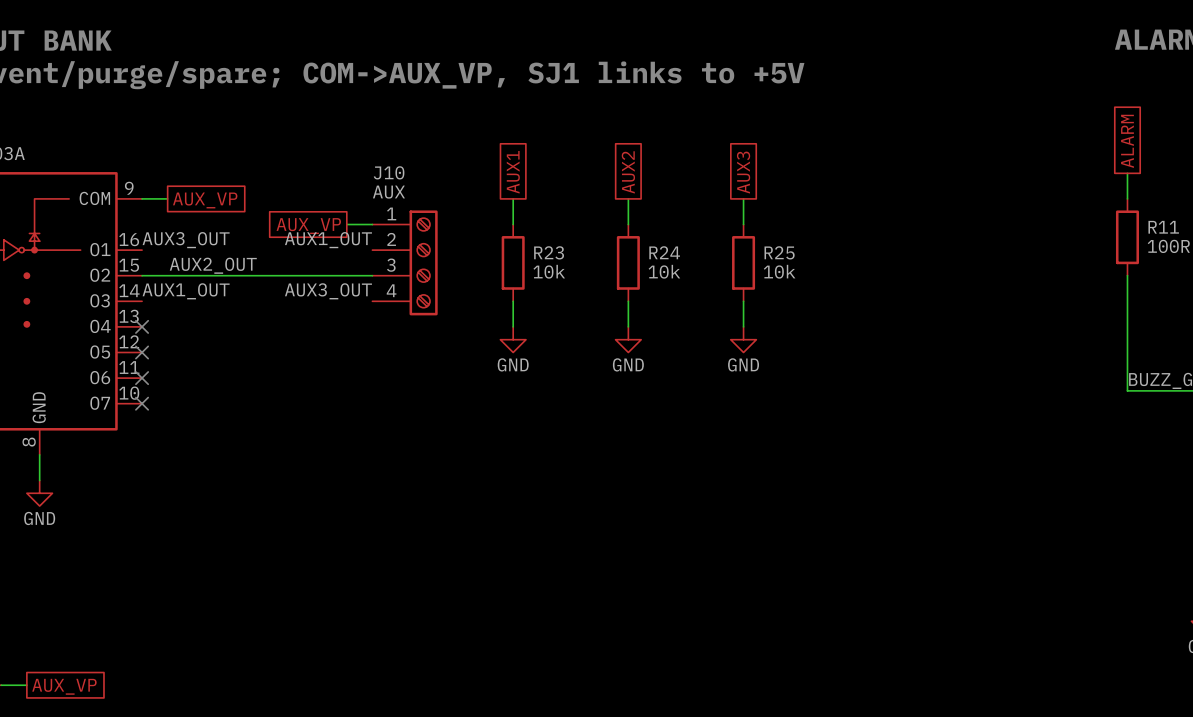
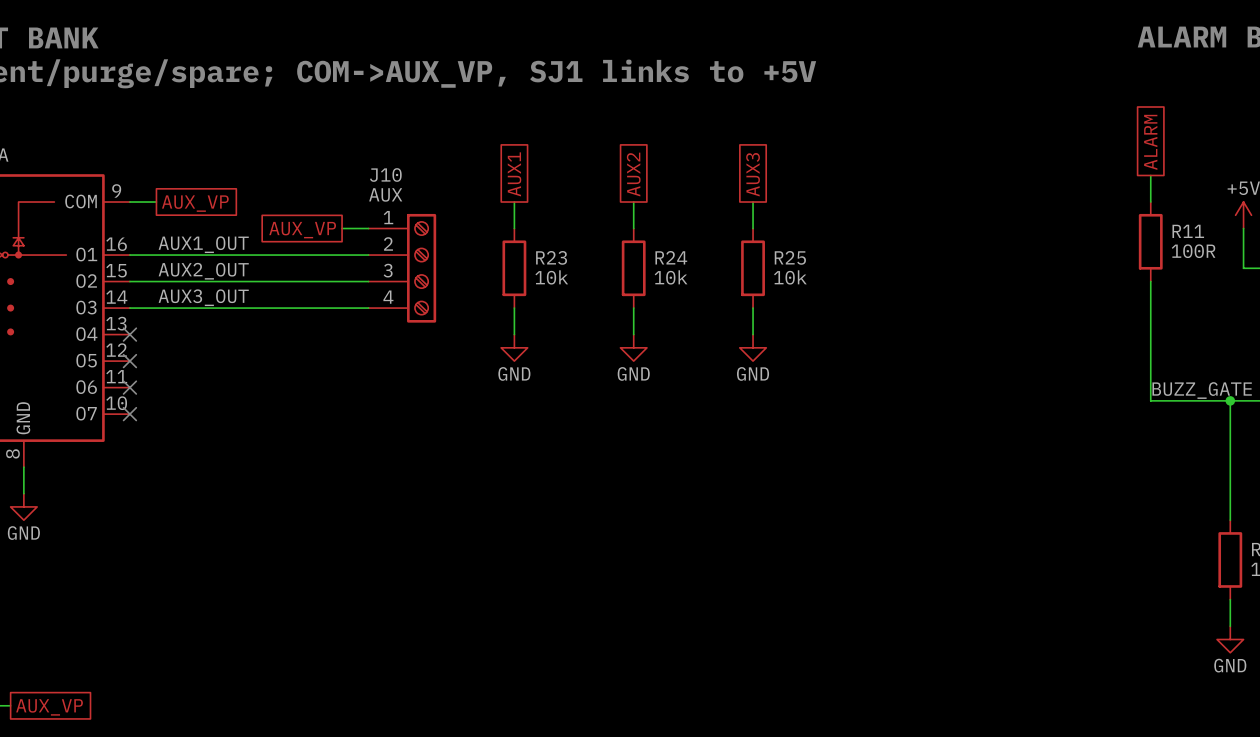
label: AUX3_OUT (186, 240) -> AUX1_OUT (203, 244)
label: AUX1_OUT (328, 240) -> none
wire: none -> (129, 255) (368, 255)
label: AUX1_OUT (186, 291) -> AUX3_OUT (203, 297)
label: AUX3_OUT (328, 291) -> none
wire: none -> (129, 308) (368, 308)

